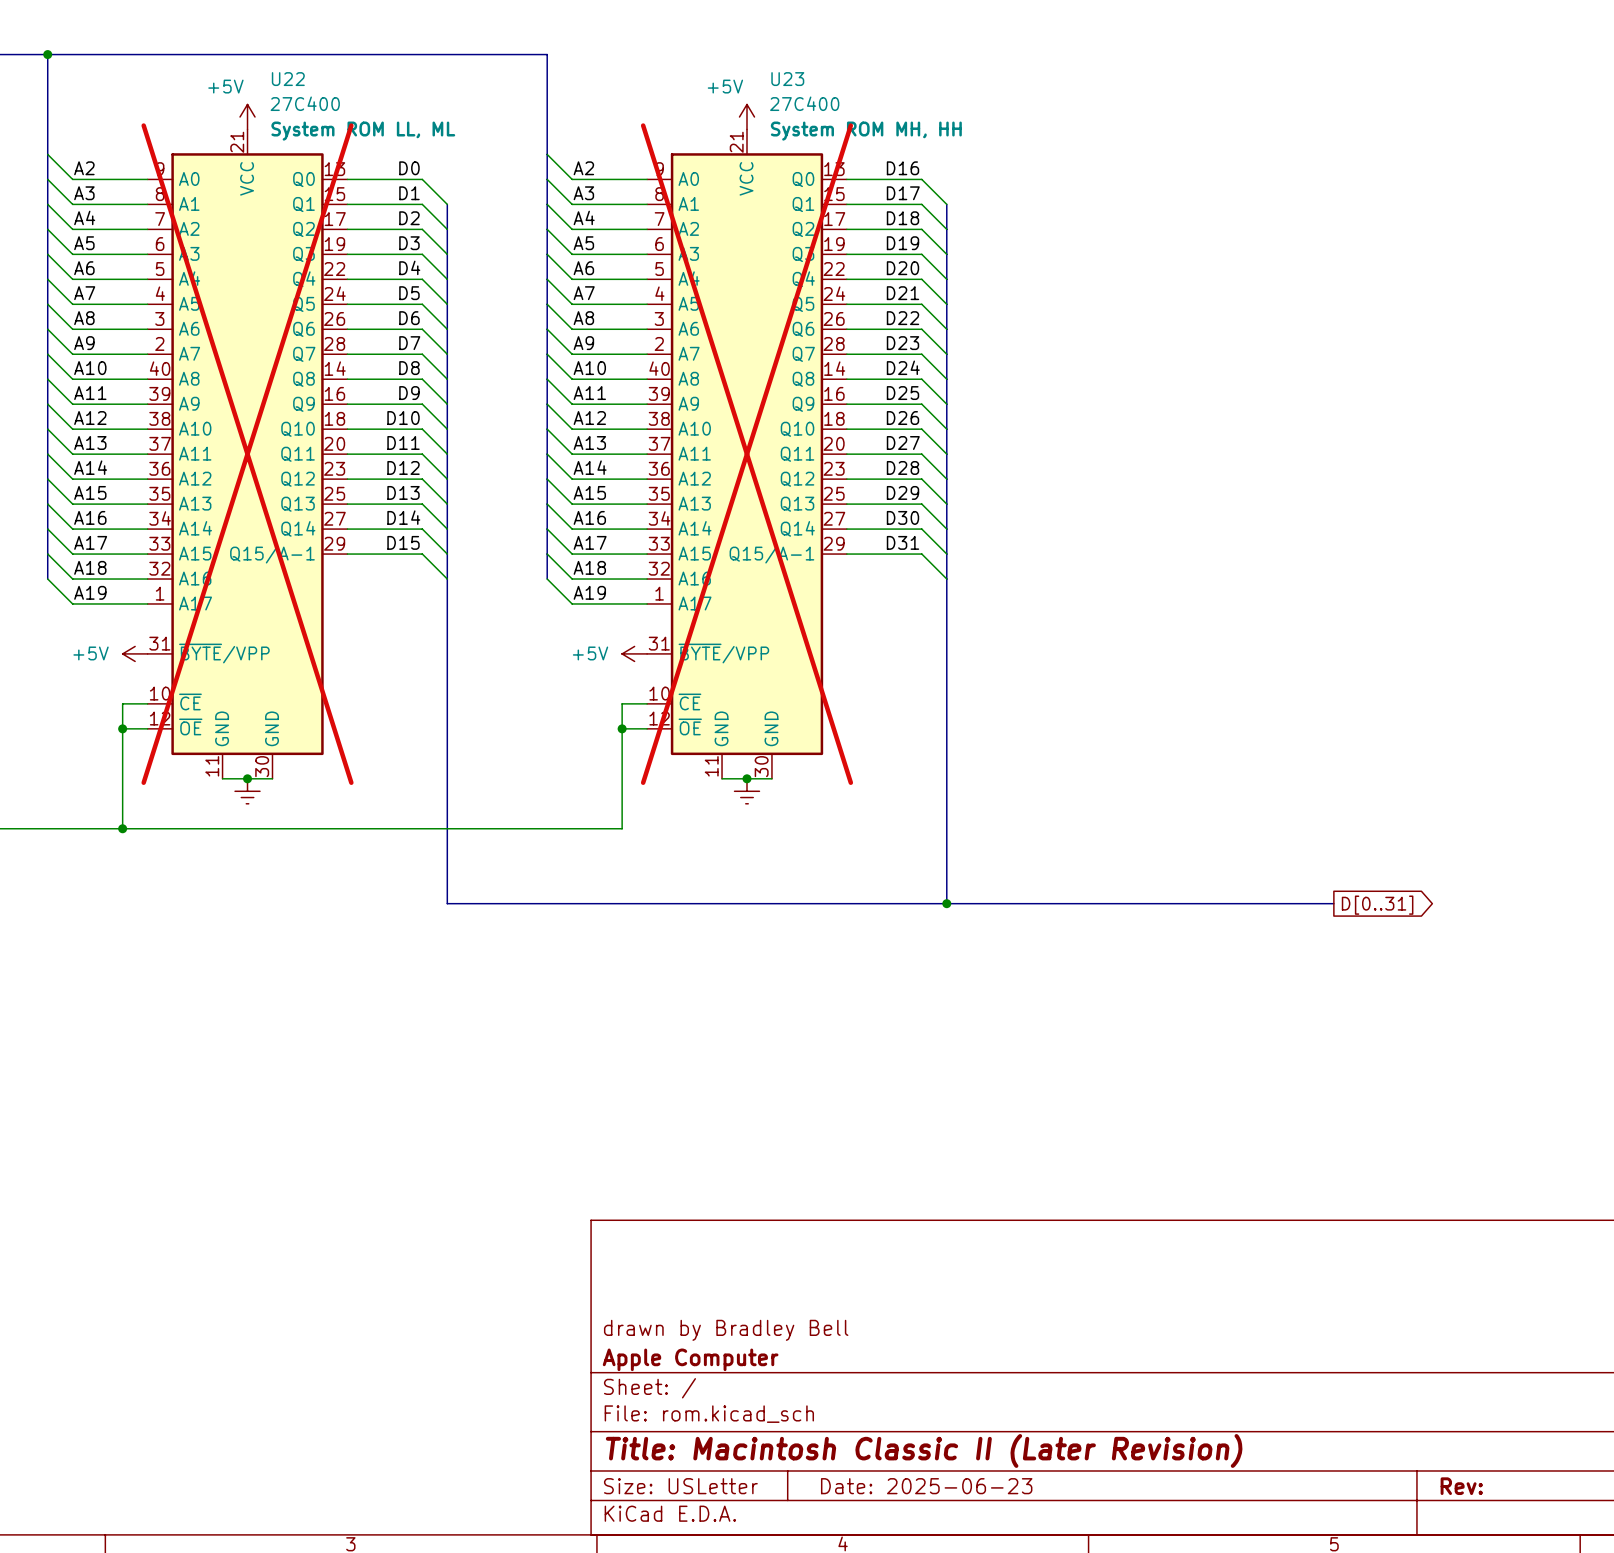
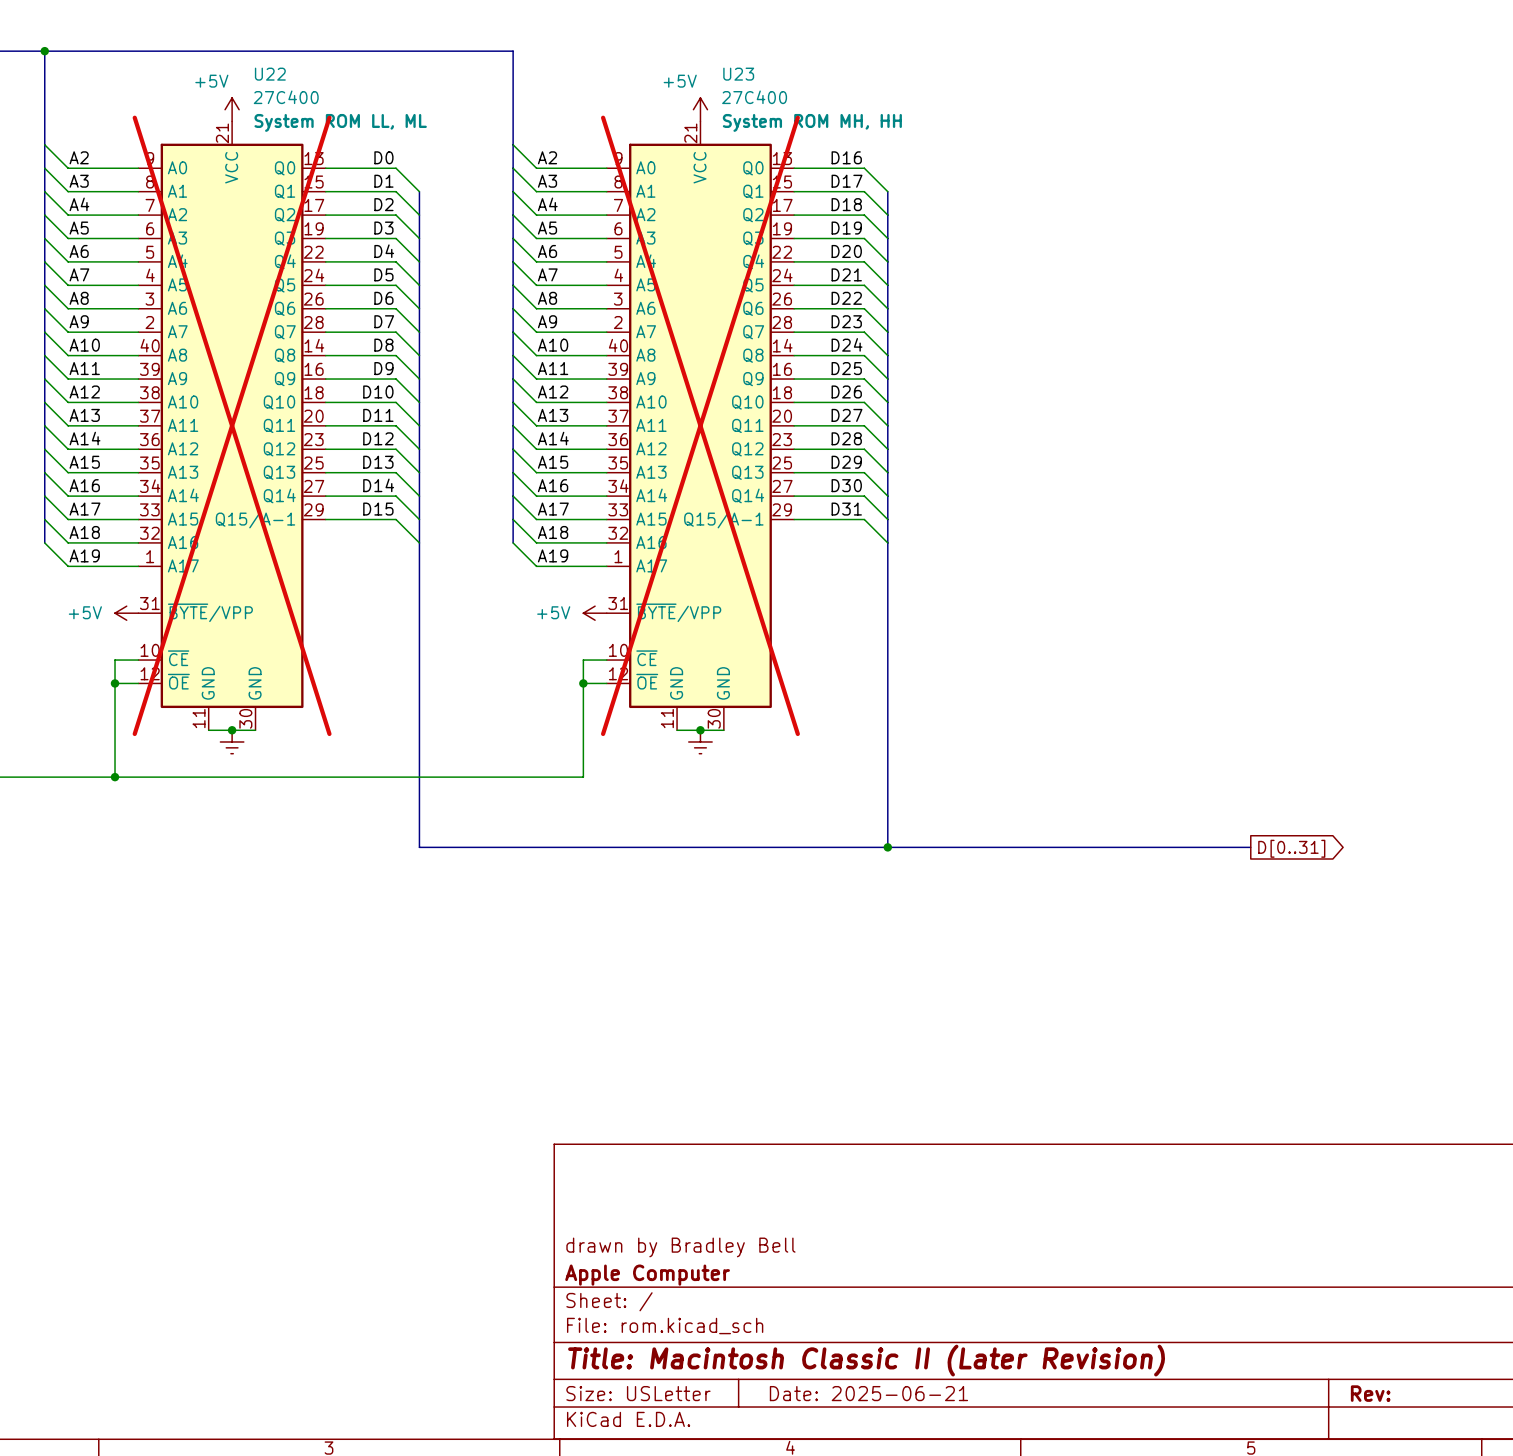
title block: Date: 2025-06-23 (926, 1486) -> Date: 2025-06-21 (868, 1393)

